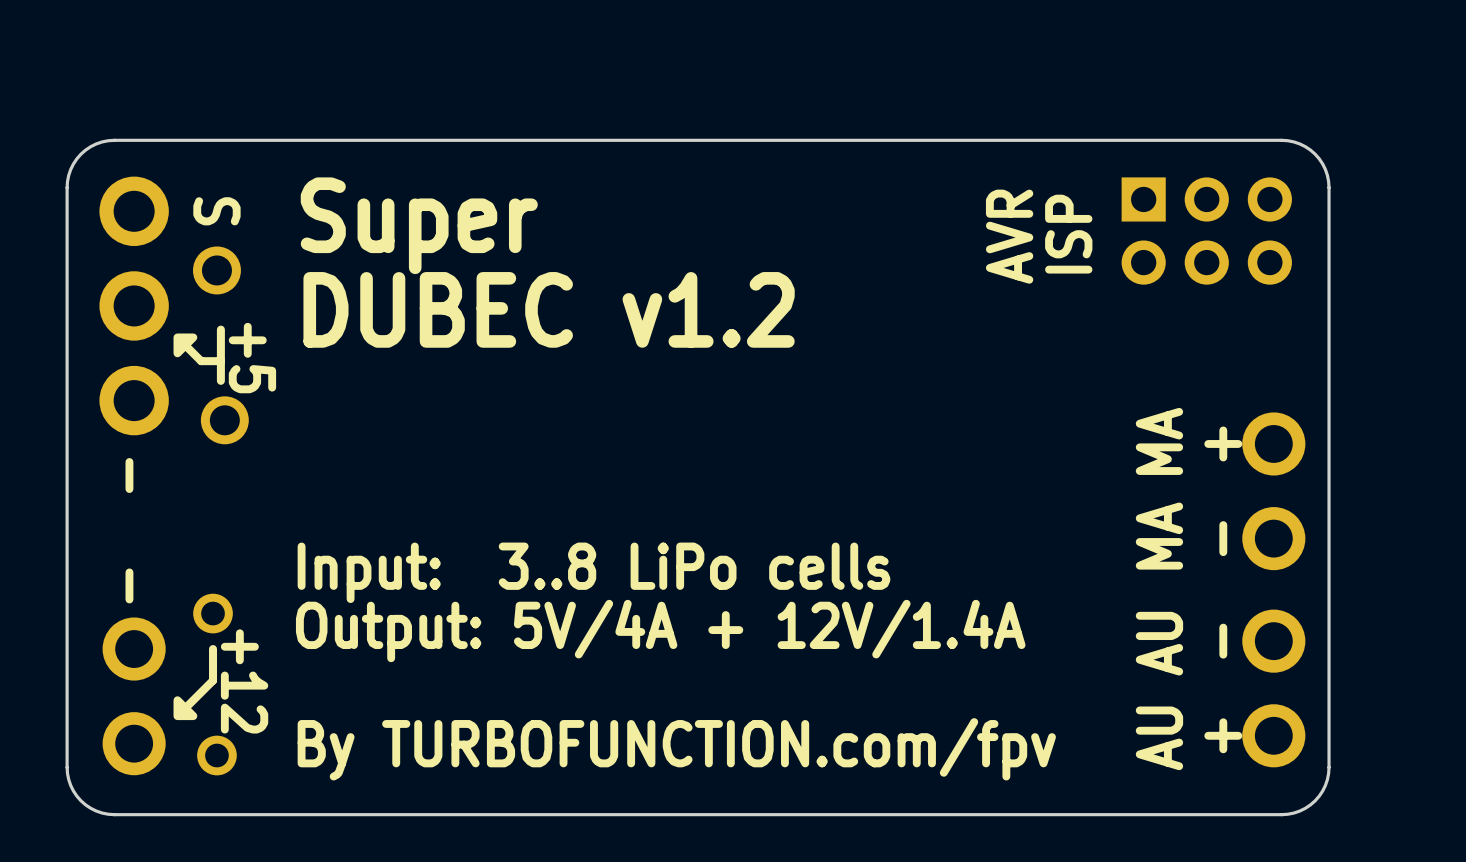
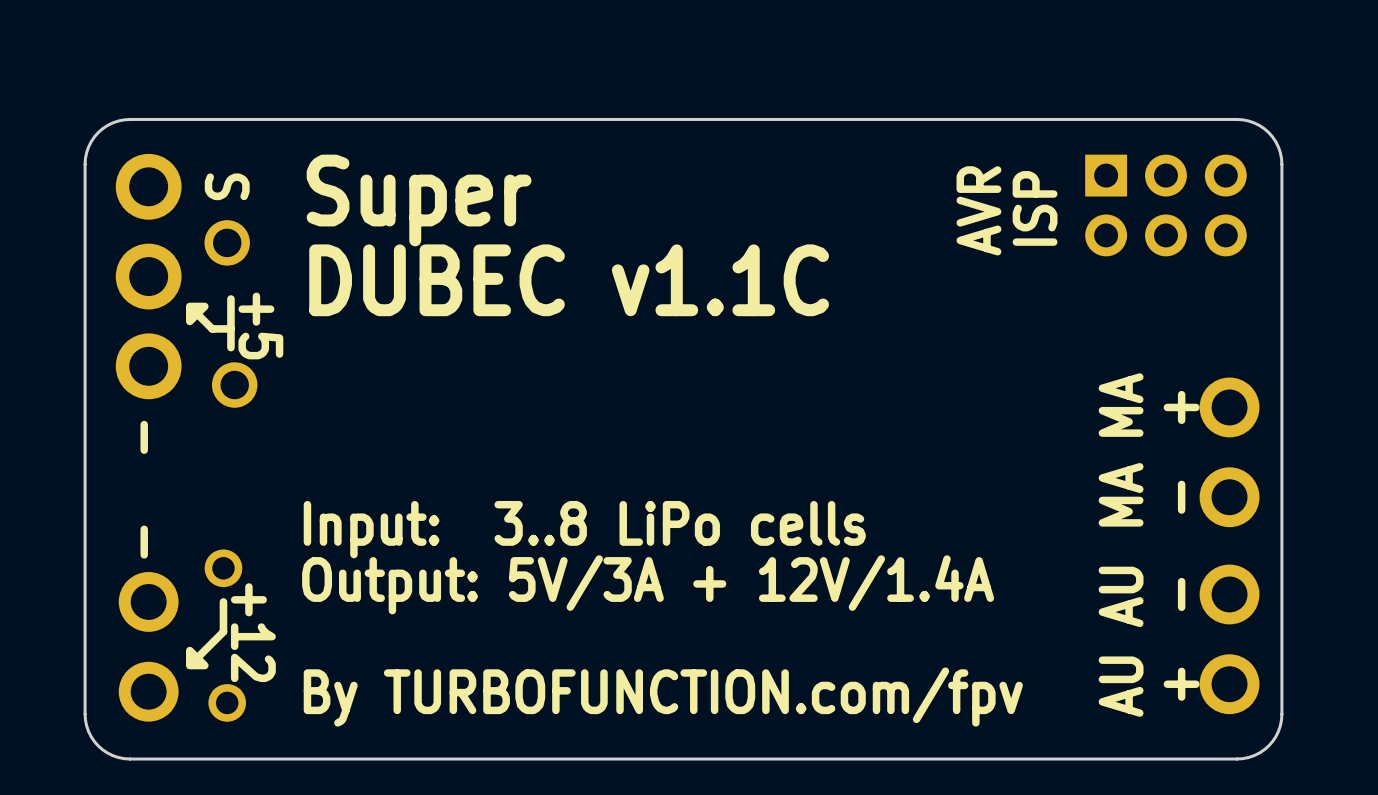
text: DUBEC v1.2 (549, 309) -> DUBEC v1.1C (569, 280)
text: Output: 5V/4A + 12V/1.4A (660, 631) -> Output: 5V/3A + 12V/1.4A (648, 584)

